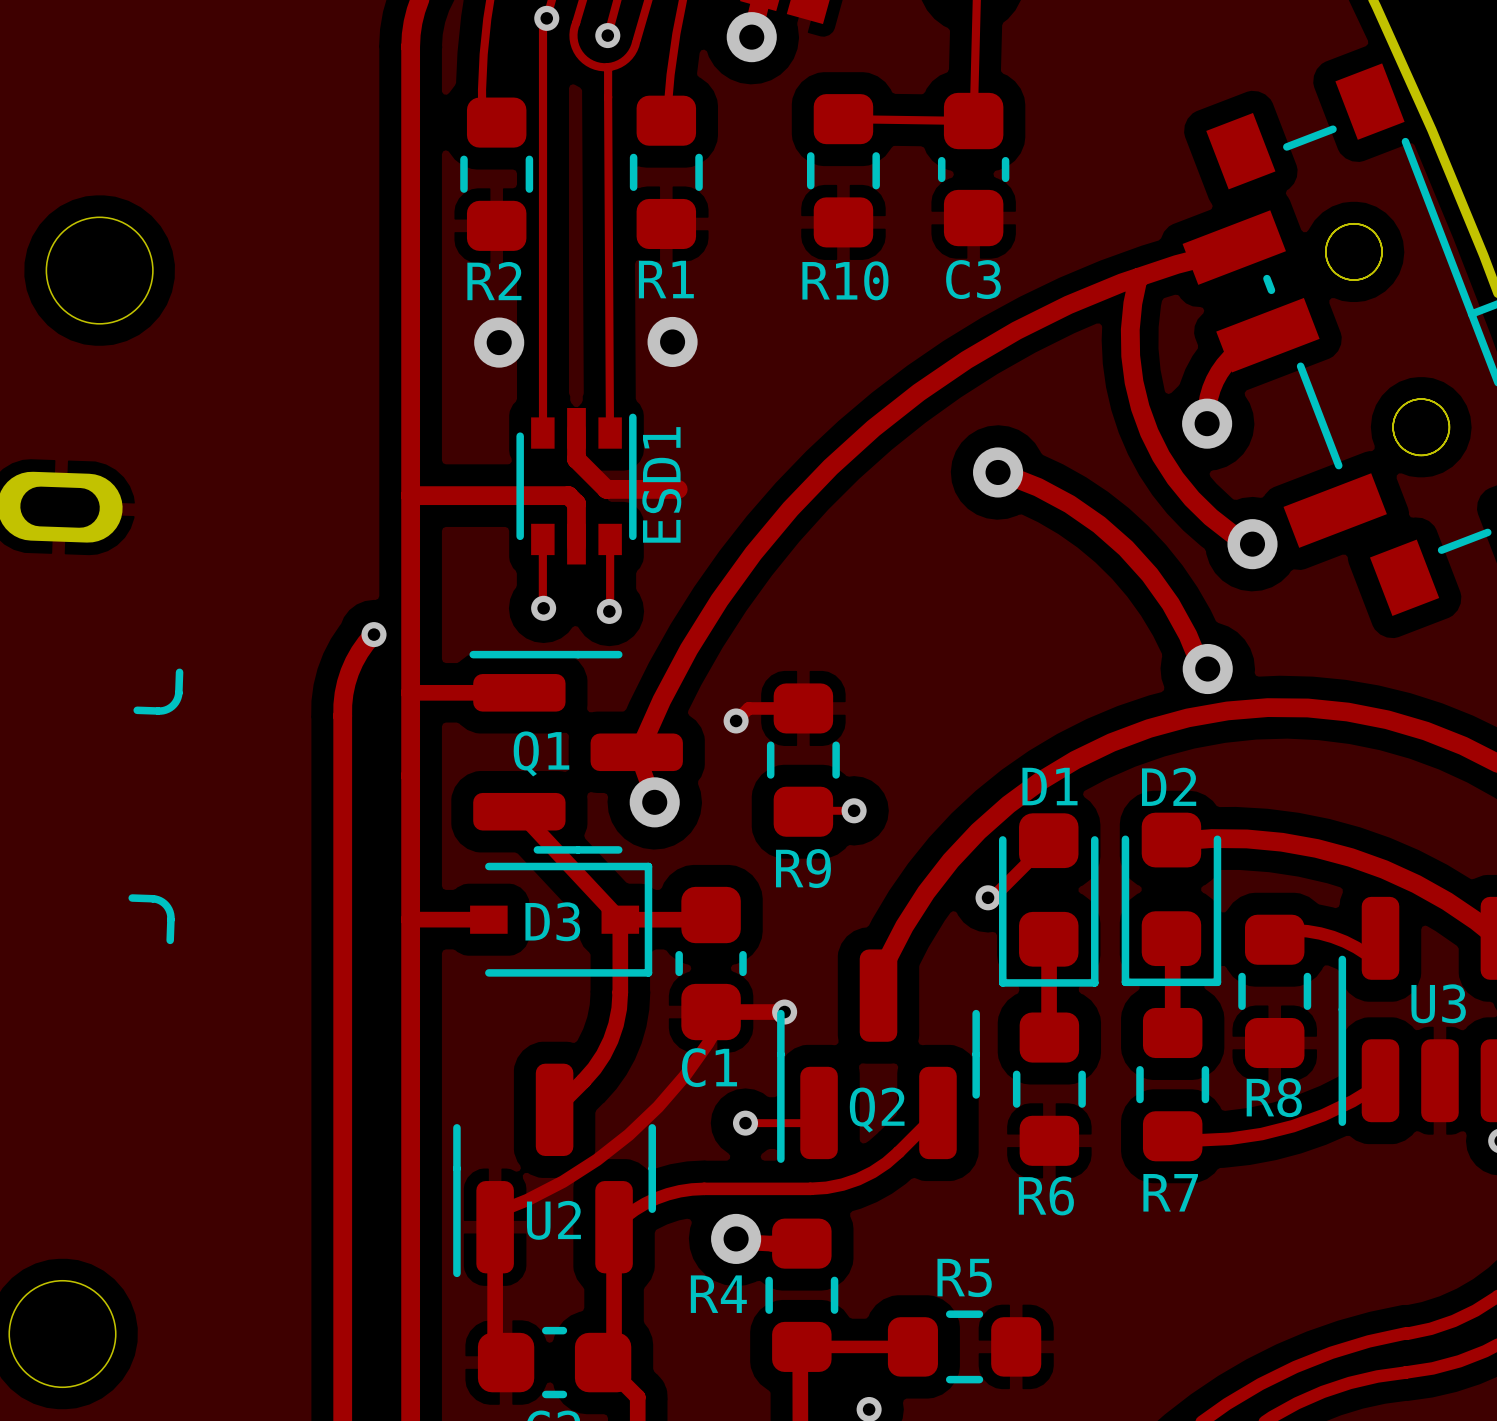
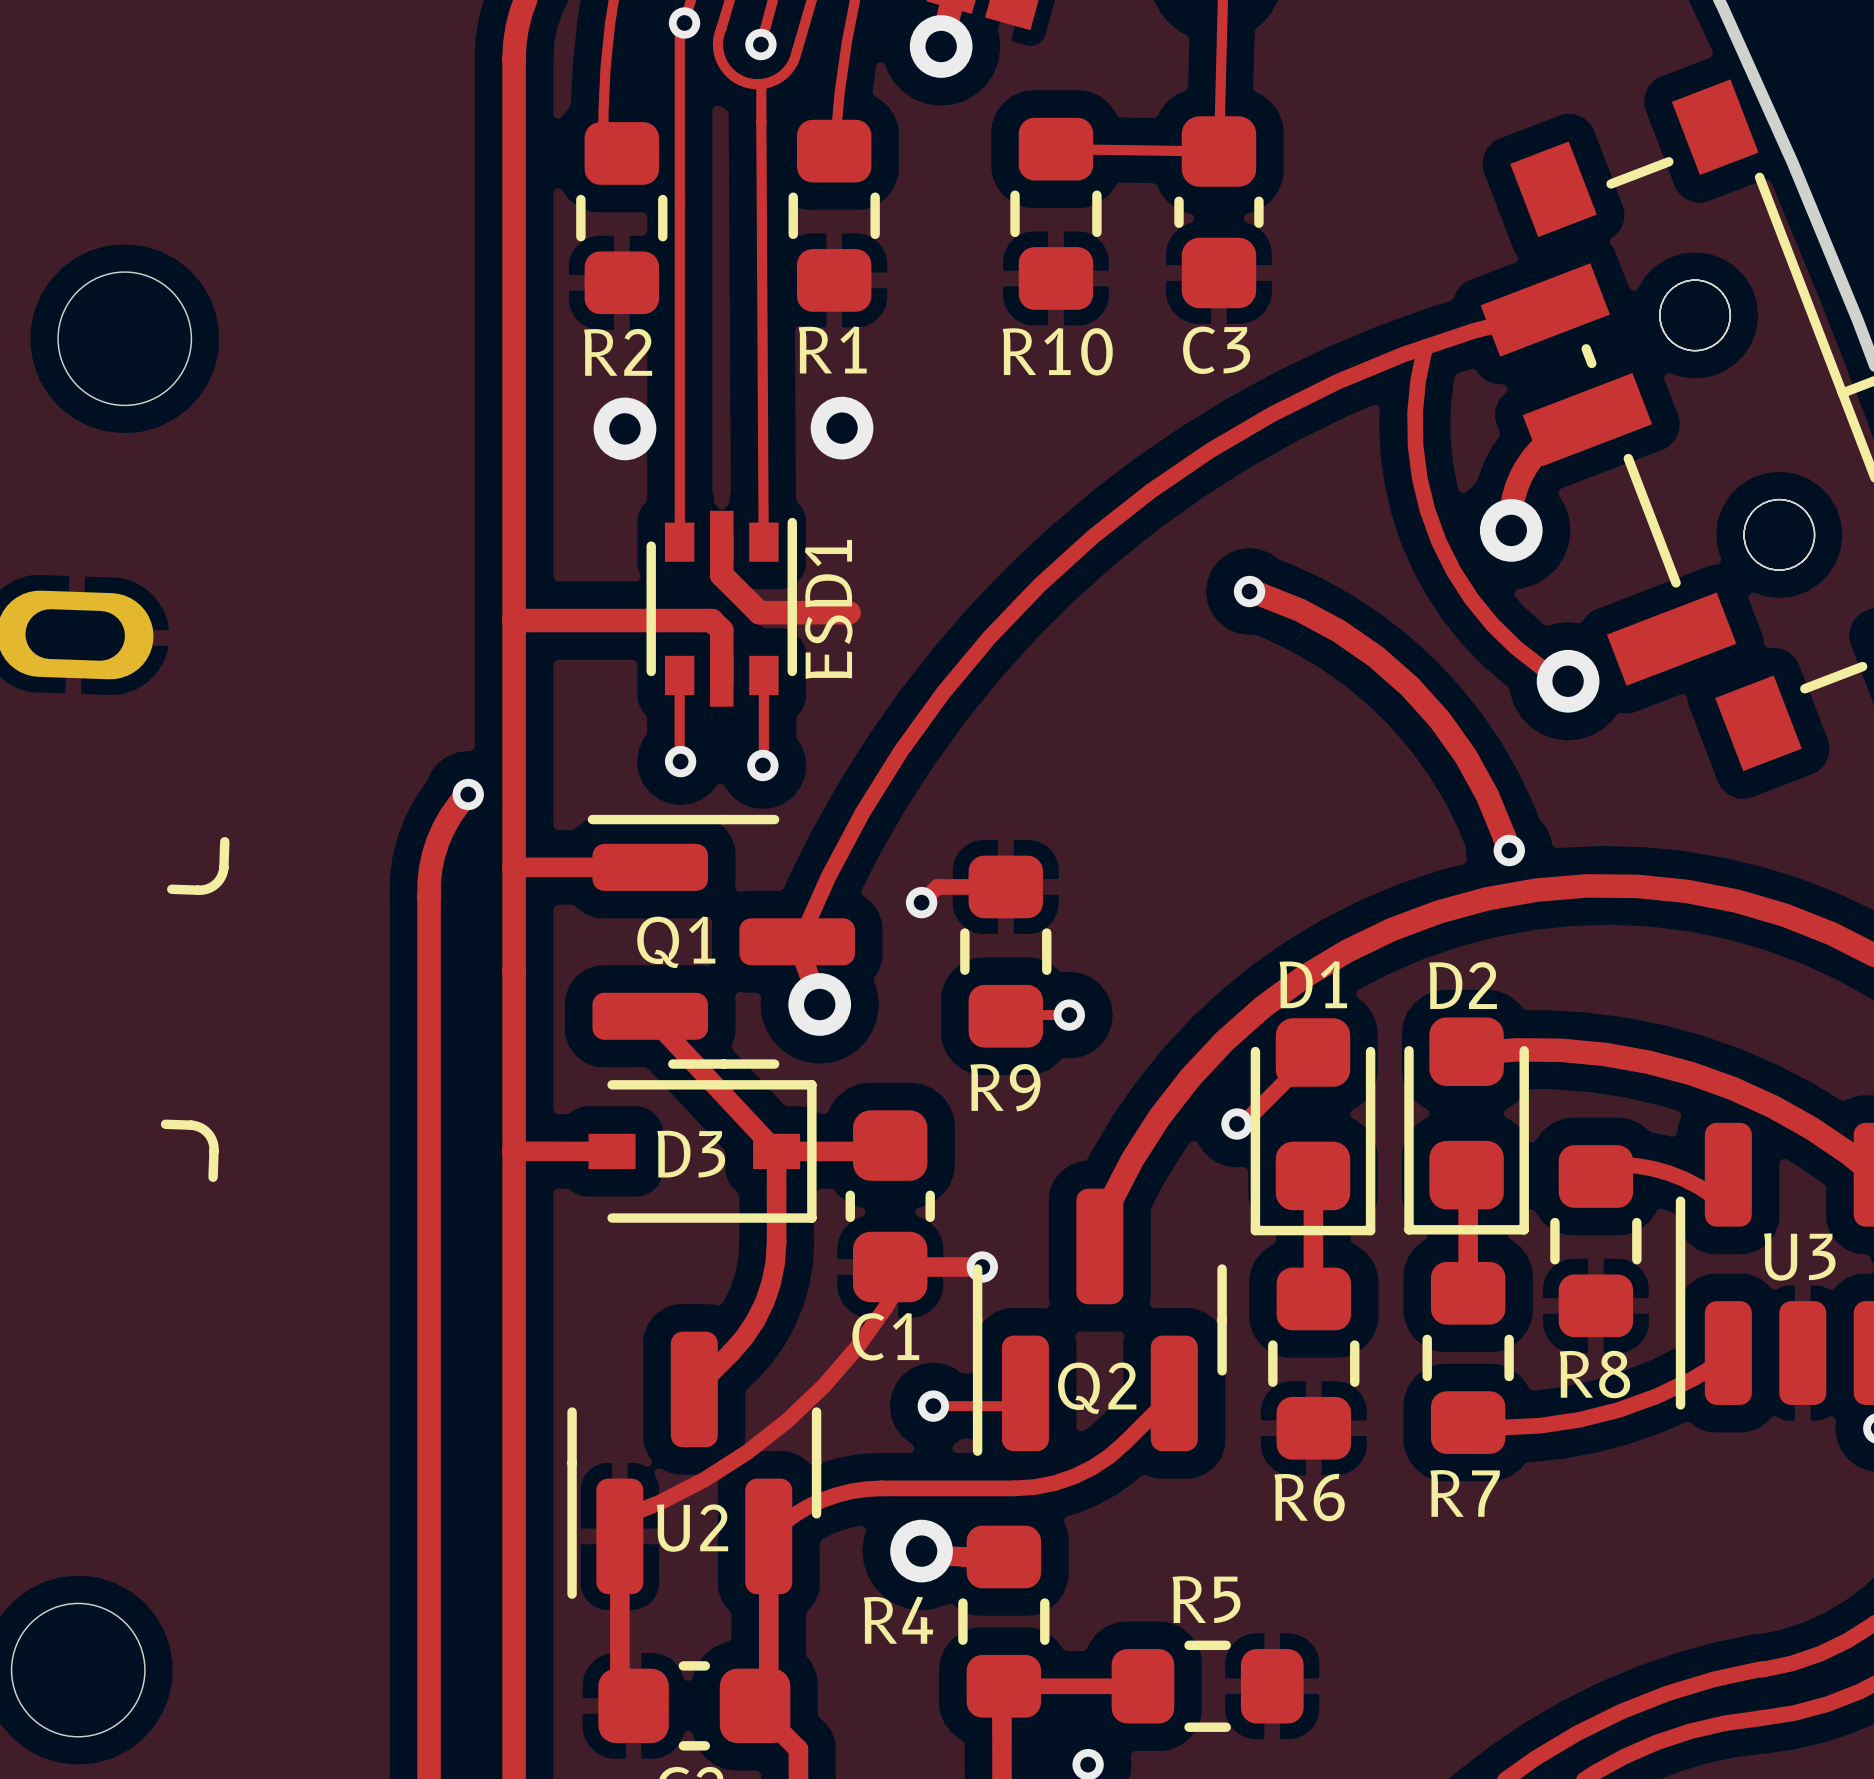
track width: thick (1232, 249) (1176, 264) (1121, 282) (1068, 304) (1016, 330) (966, 359) (918, 392) (873, 428) (830, 467) (790, 508) (753, 553) (719, 600) (688, 649) (661, 700) (638, 753) -> thin (1543, 312) (1473, 331) (1404, 354) (1337, 381) (1272, 413) (1210, 450) (1150, 491) (1093, 536) (1039, 584) (989, 637) (943, 692) (900, 751) (862, 812) (828, 876) (798, 942)
track width: thick (1138, 277) (1132, 303) (1130, 355) (1140, 407) (1149, 432) (1161, 456) (1191, 498) (1231, 533) (1254, 547) -> thin (1425, 347) (1418, 379) (1415, 412) (1415, 445) (1419, 478) (1427, 510) (1438, 541) (1453, 571) (1471, 598) (1492, 624) (1515, 647) (1541, 667) (1570, 685)
via size: [973, 447, 1024, 498] -> [1233, 575, 1266, 608]
via size: [1182, 643, 1233, 695] -> [1493, 834, 1525, 867]

